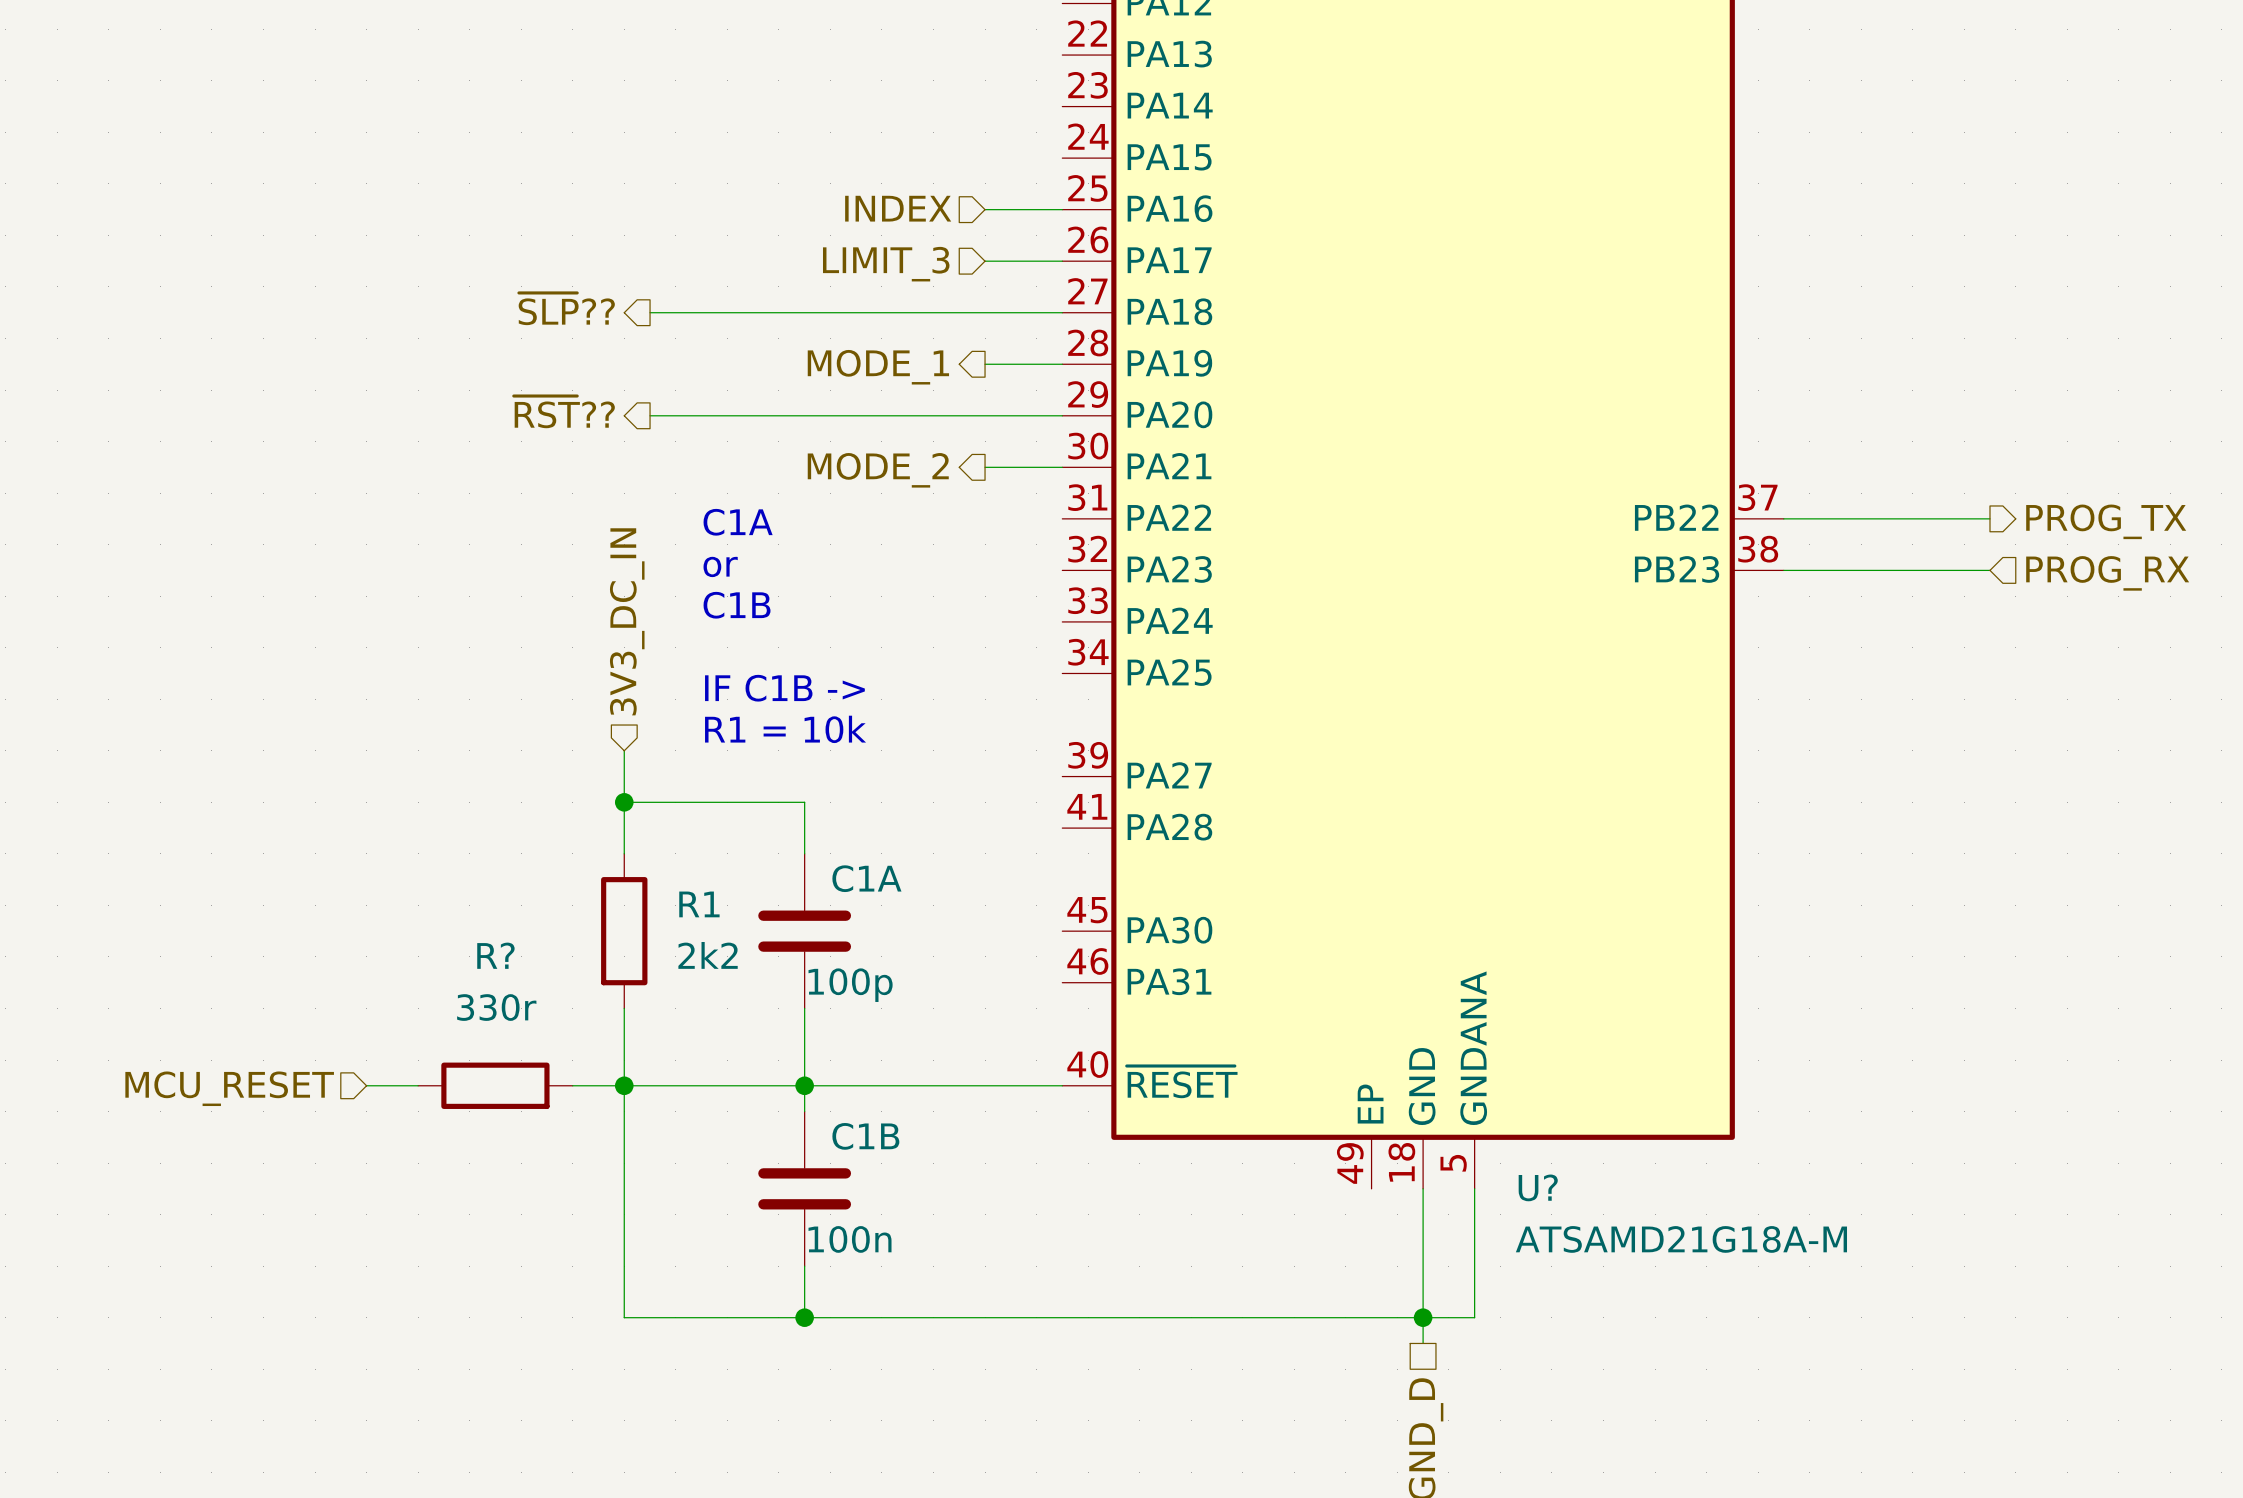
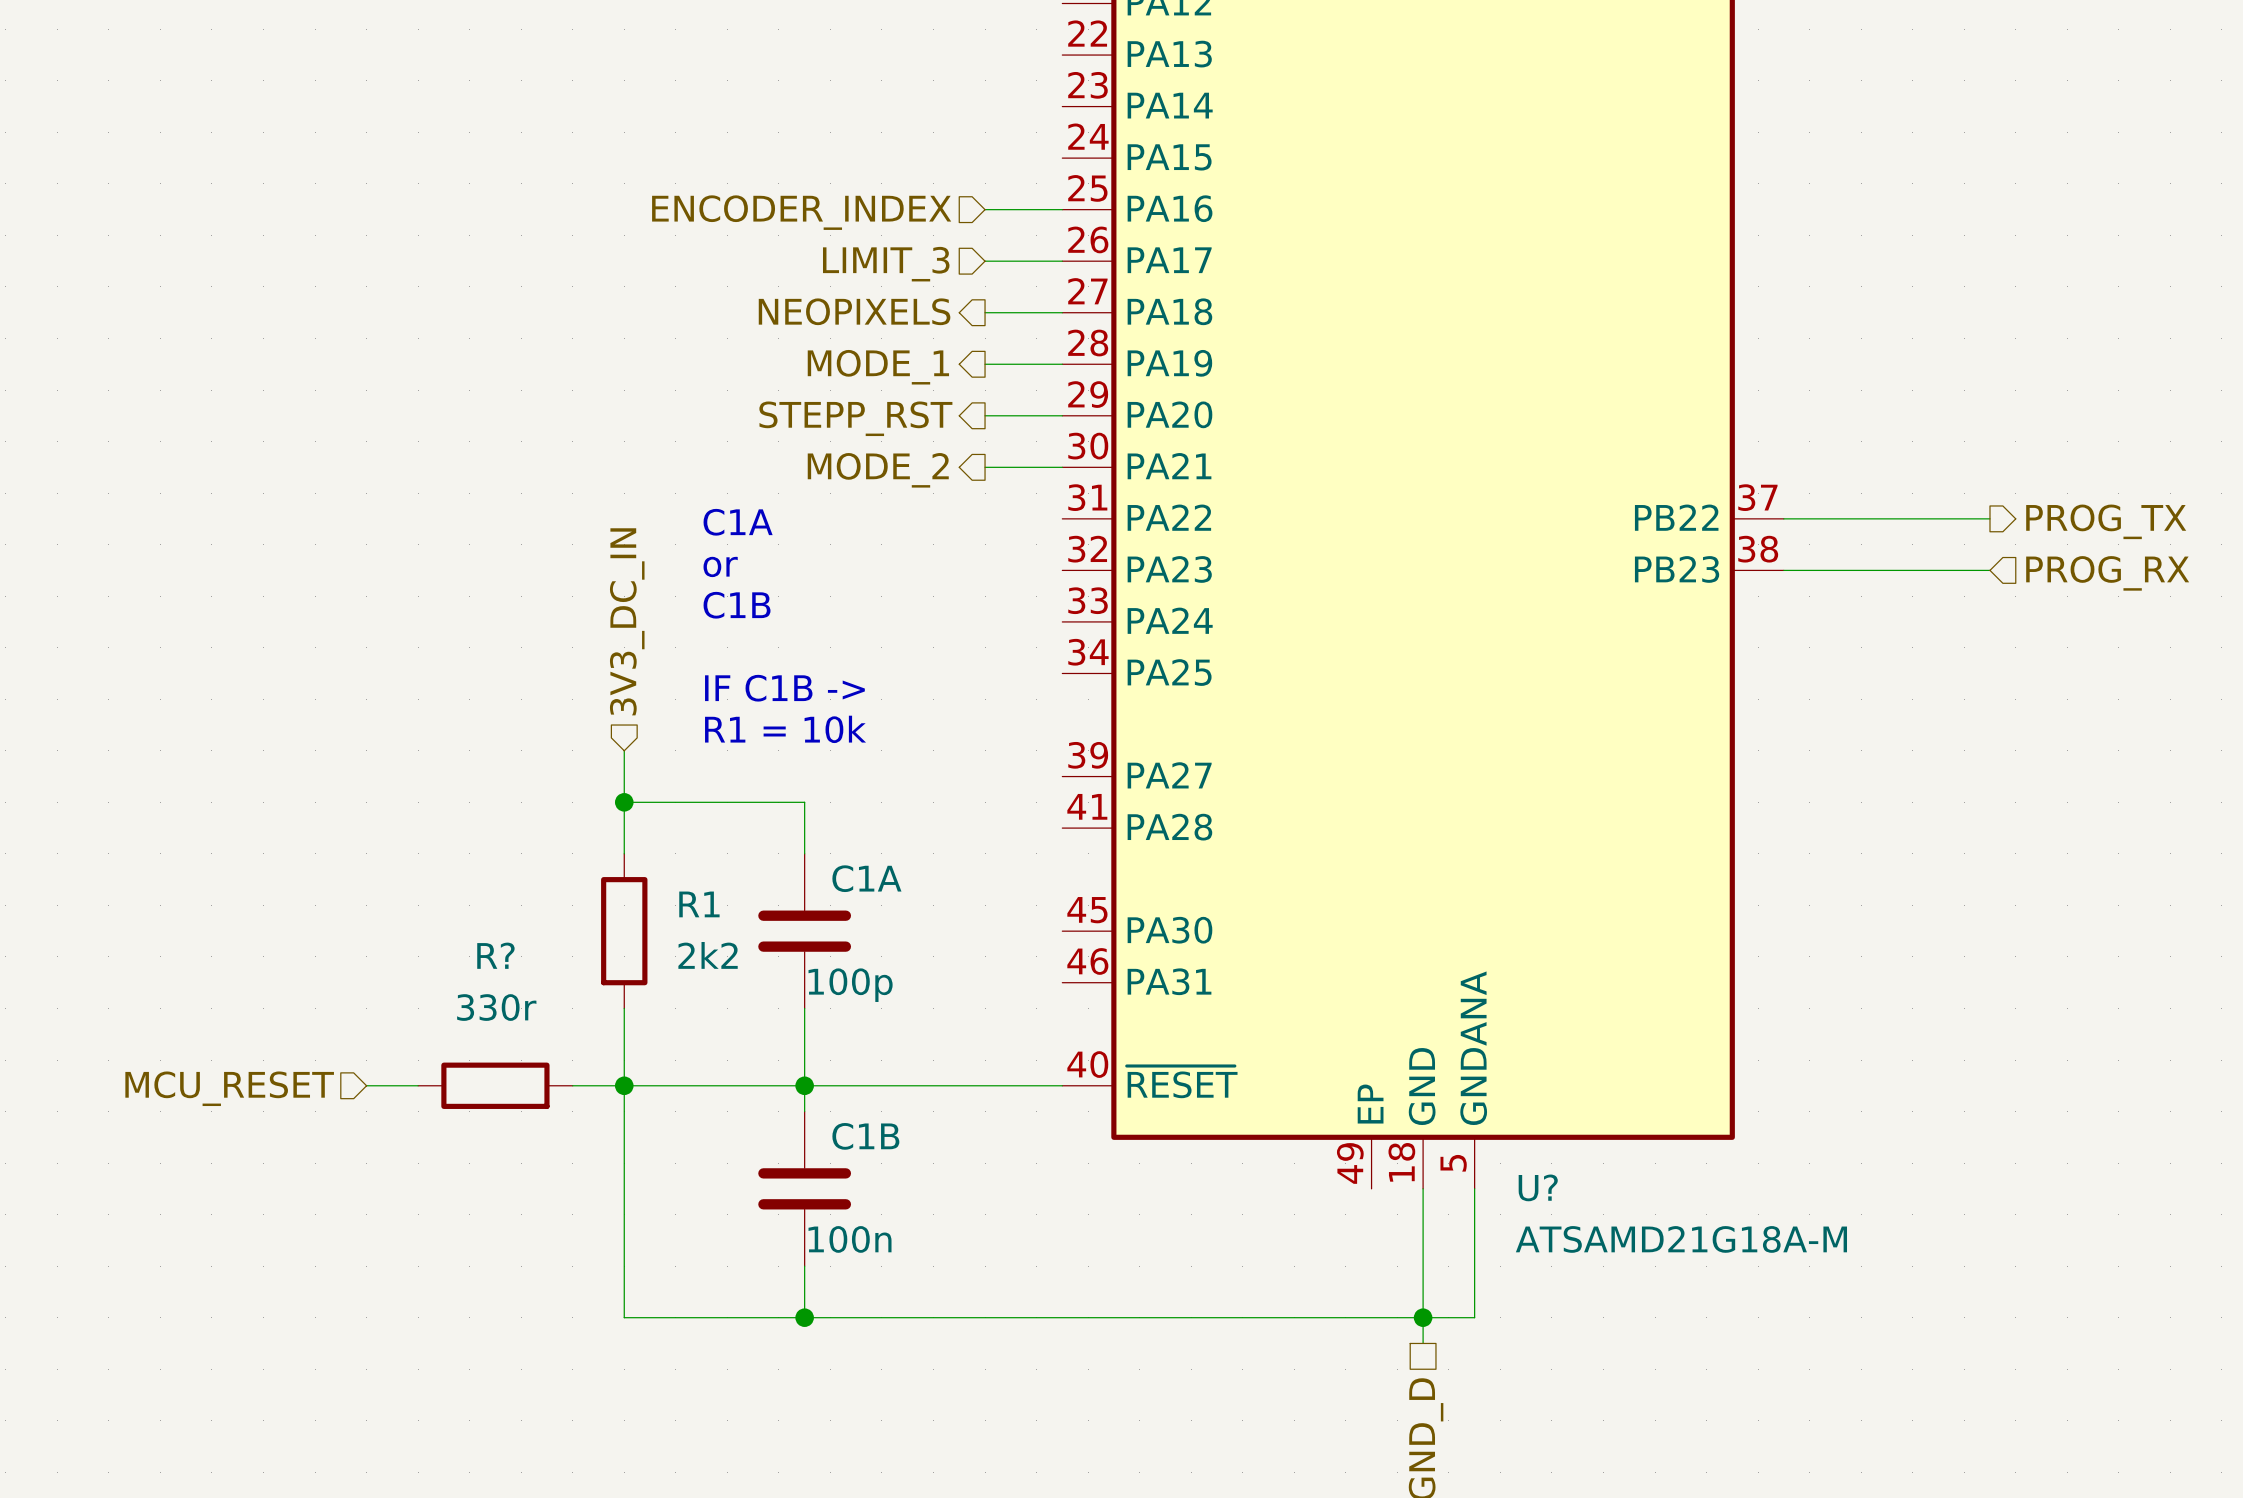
hierarchical label: INDEX (898, 208) -> ENCODER_INDEX (801, 212)
hierarchical label: ~{SLP}?? (566, 309) -> none
hierarchical label: none -> NEOPIXELS (854, 311)
wire: (650, 312) (985, 312) -> none
hierarchical label: ~{RST}?? (564, 412) -> none
wire: (650, 415) (985, 415) -> none
hierarchical label: none -> STEPP_RST (855, 418)

